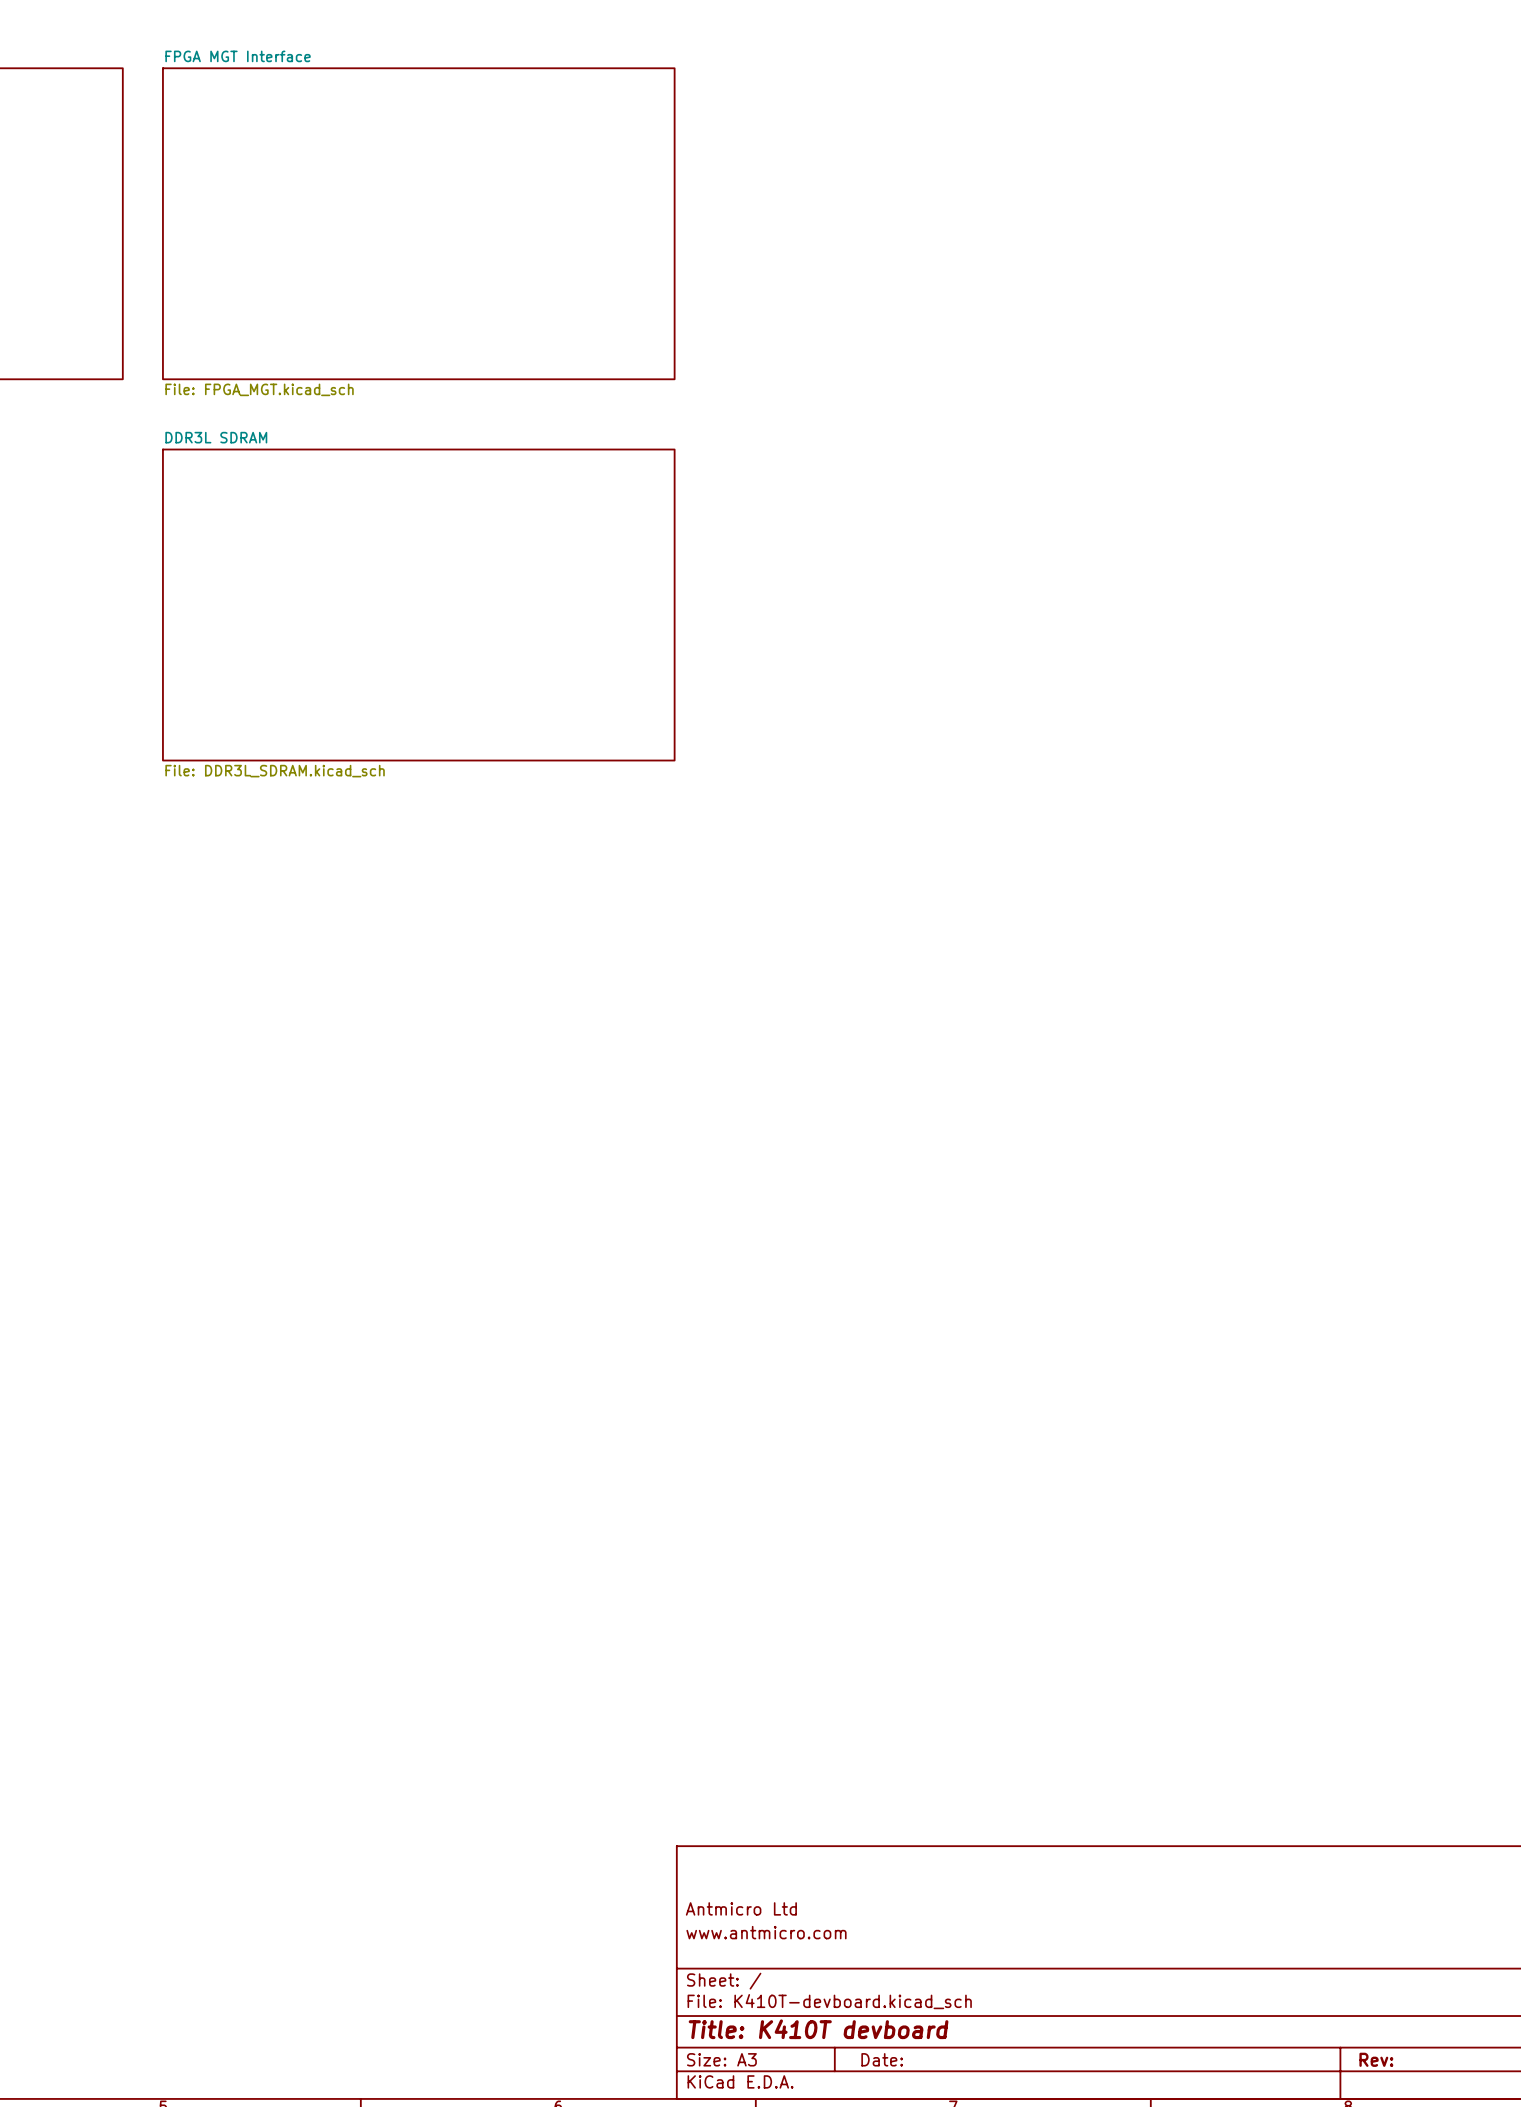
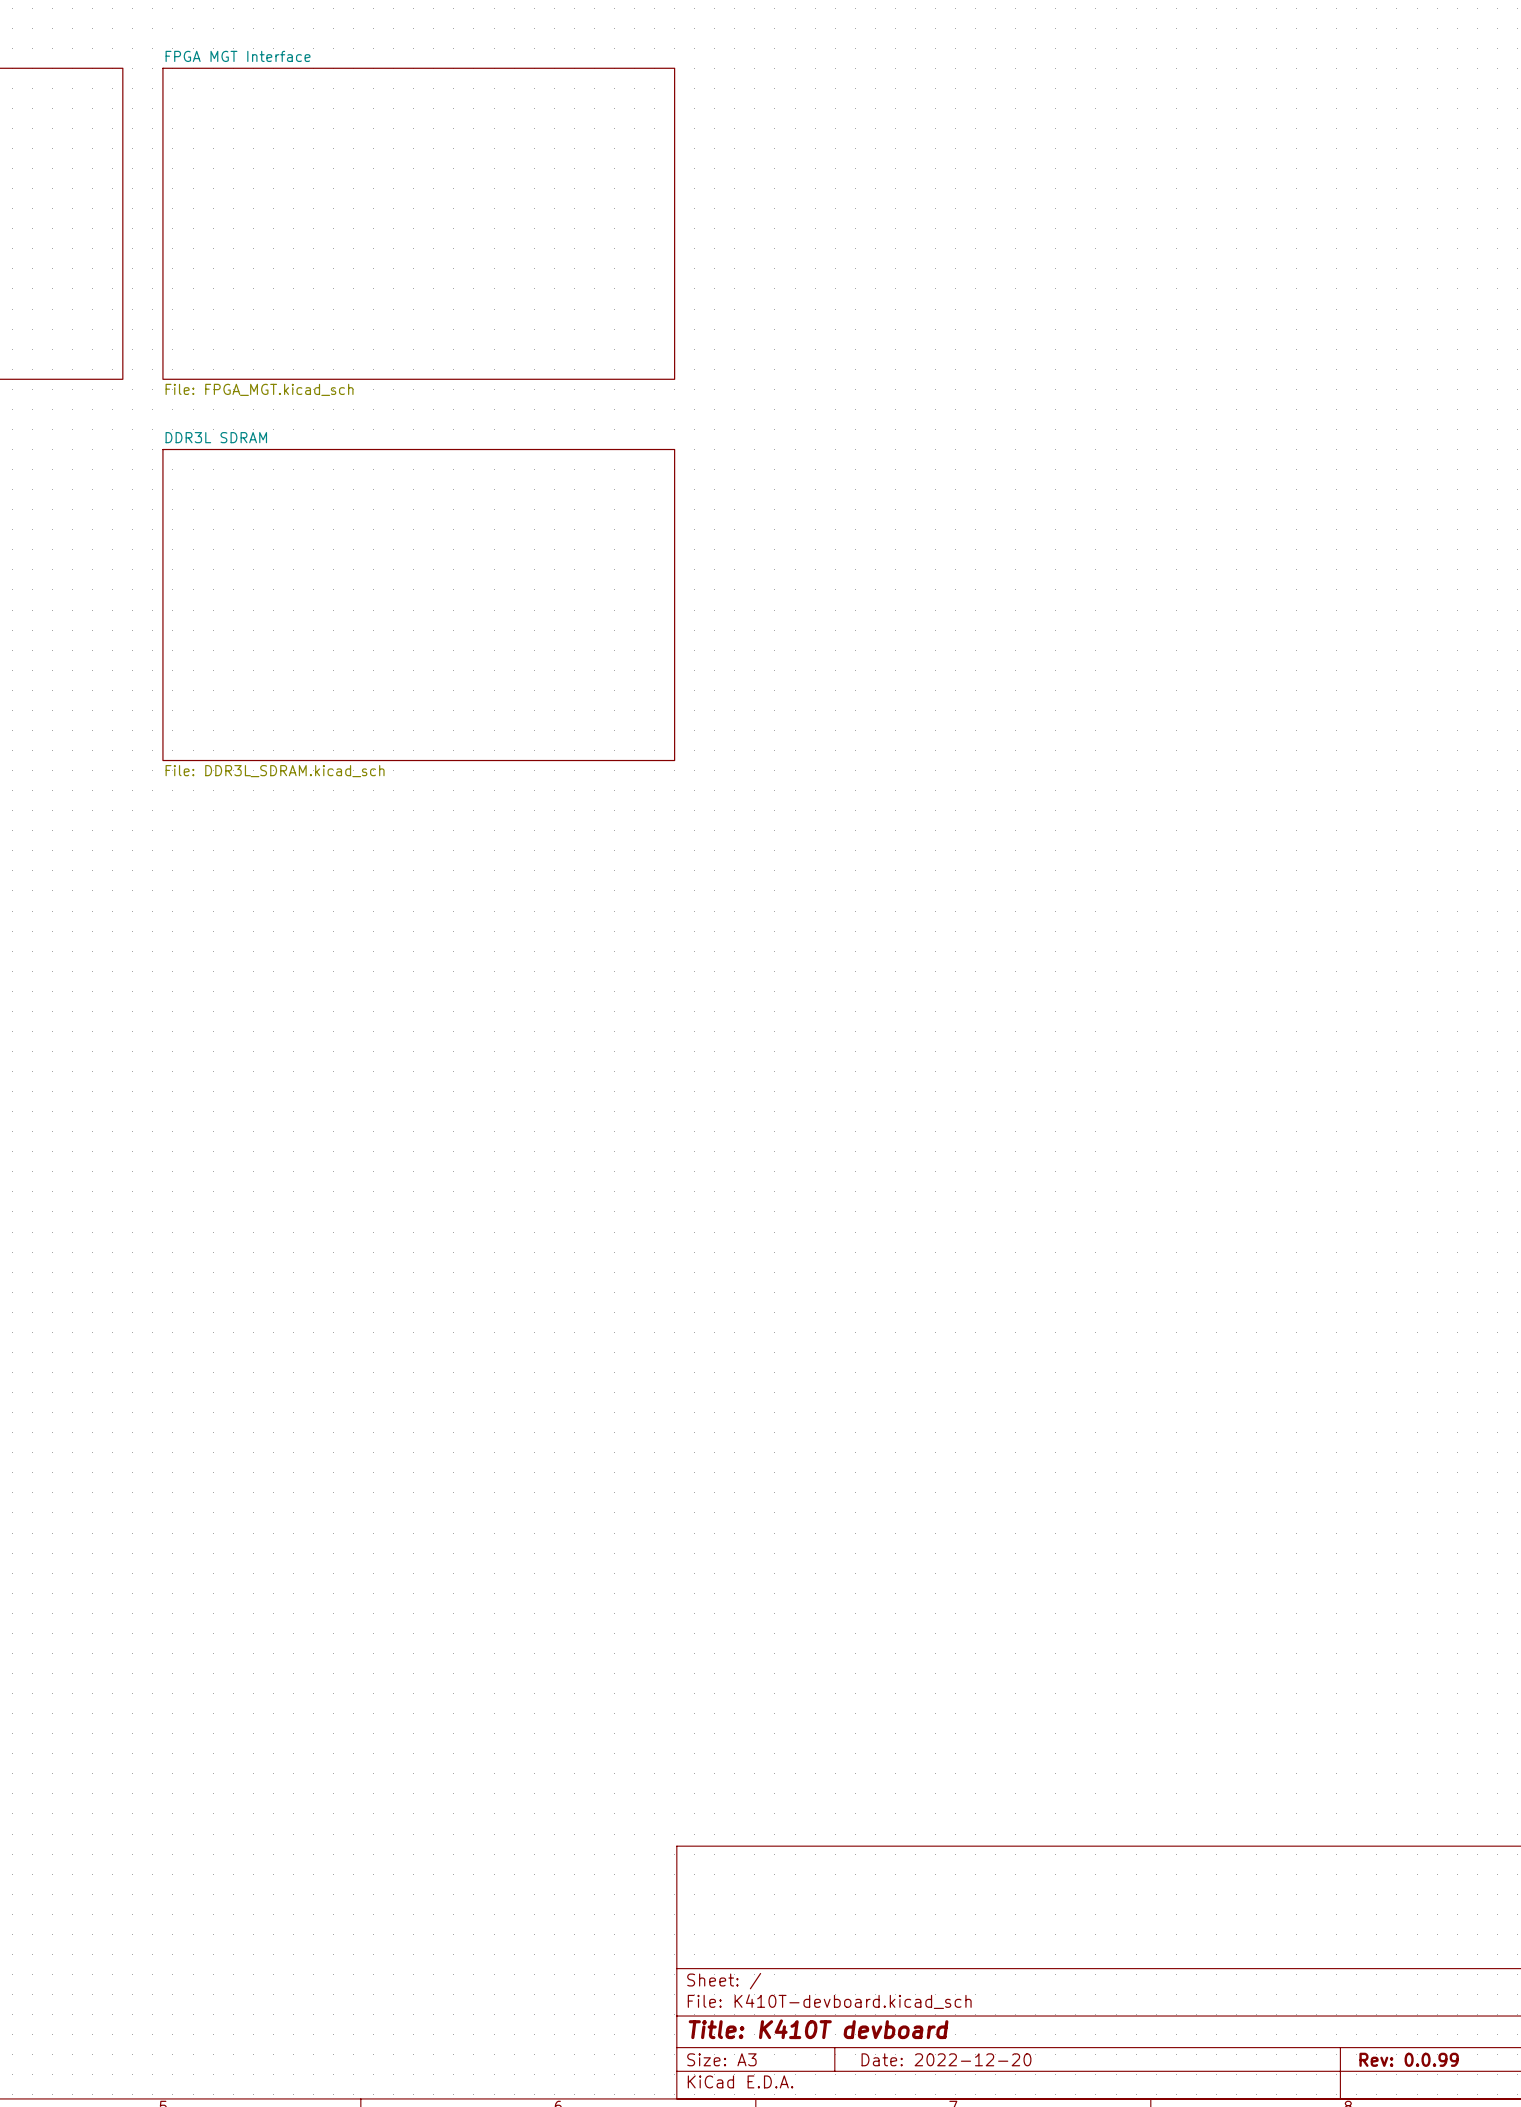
title block: Antmicro Ltd (741, 1908) -> none
title block: www.antmicro.com (766, 1932) -> none
title block: Date: (882, 2059) -> Date: 2022-12-20 (946, 2059)
title block: Rev: (1376, 2059) -> Rev: 0.0.99 (1409, 2059)

